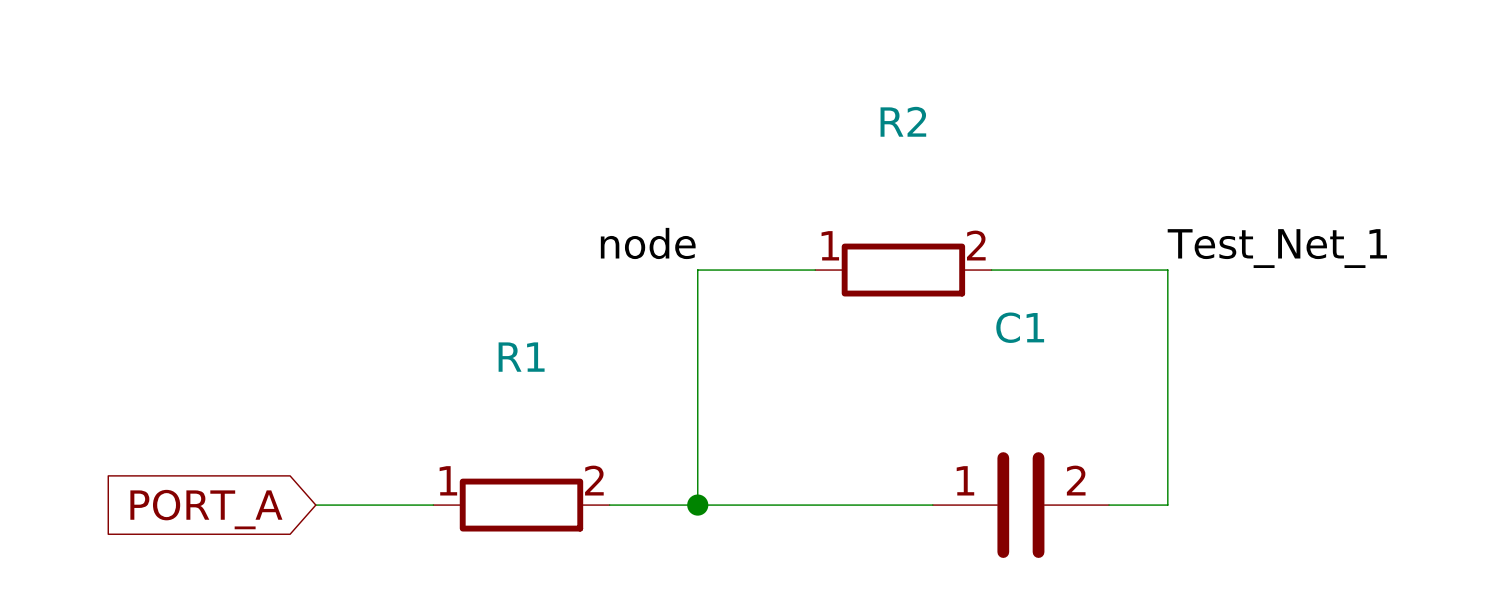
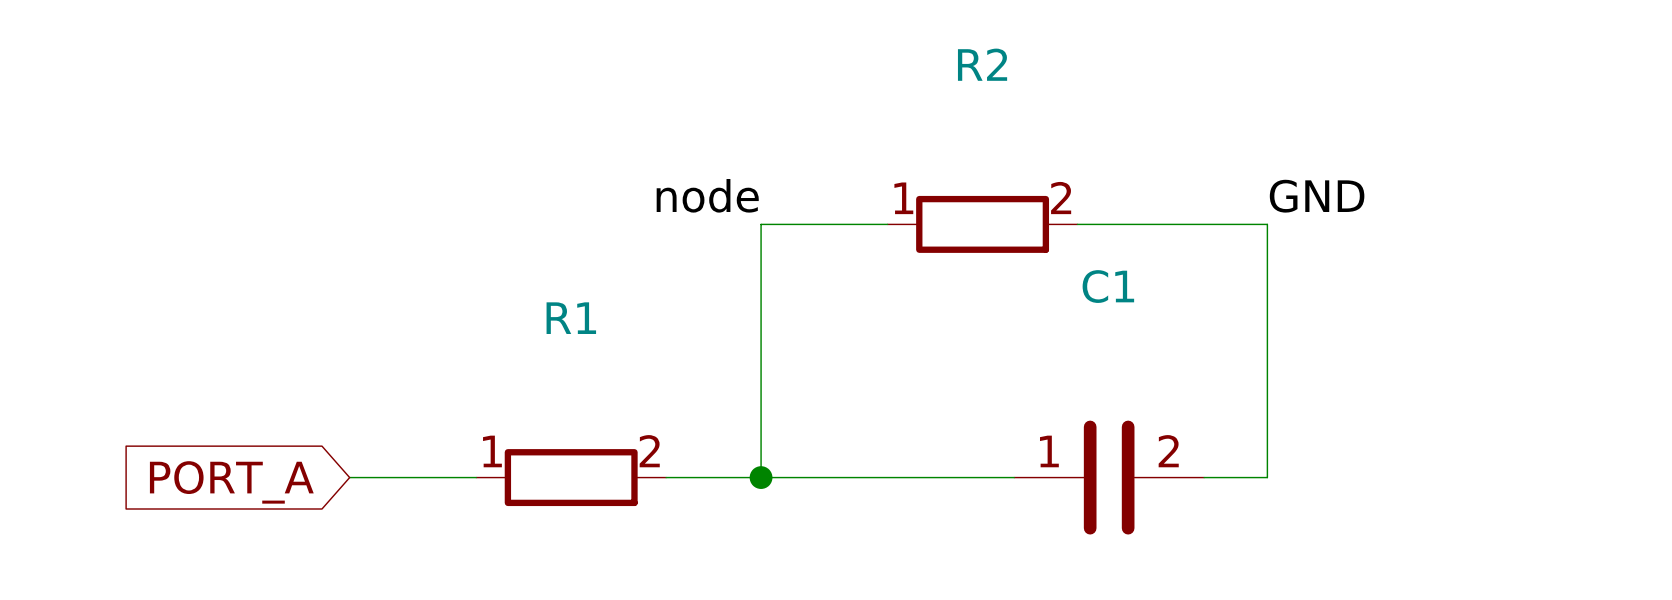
label: Test_Net_1 (1277, 248) -> GND (1317, 196)

